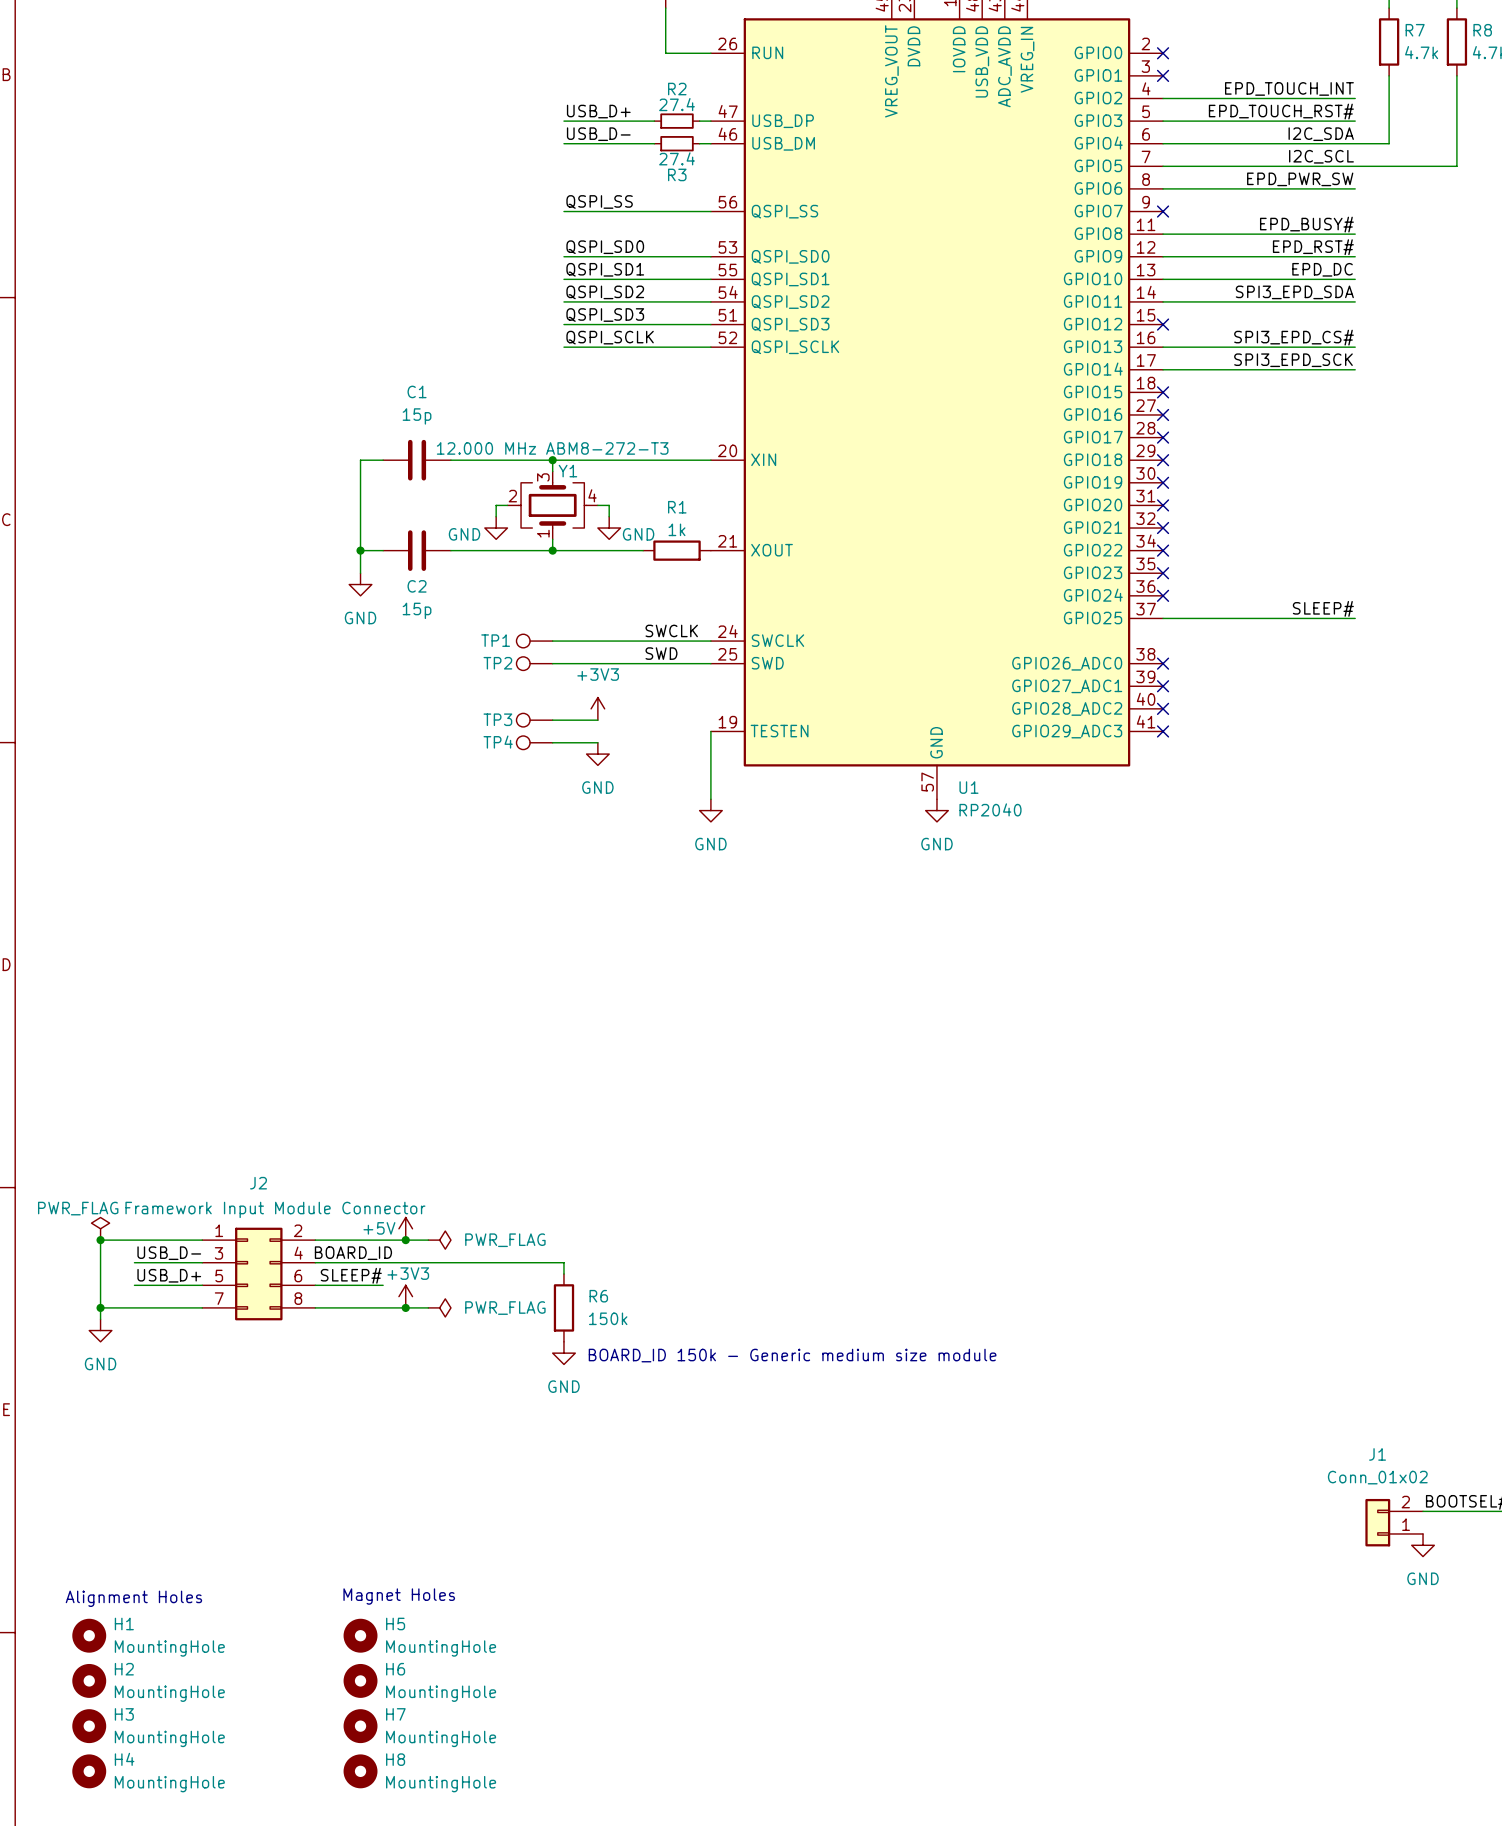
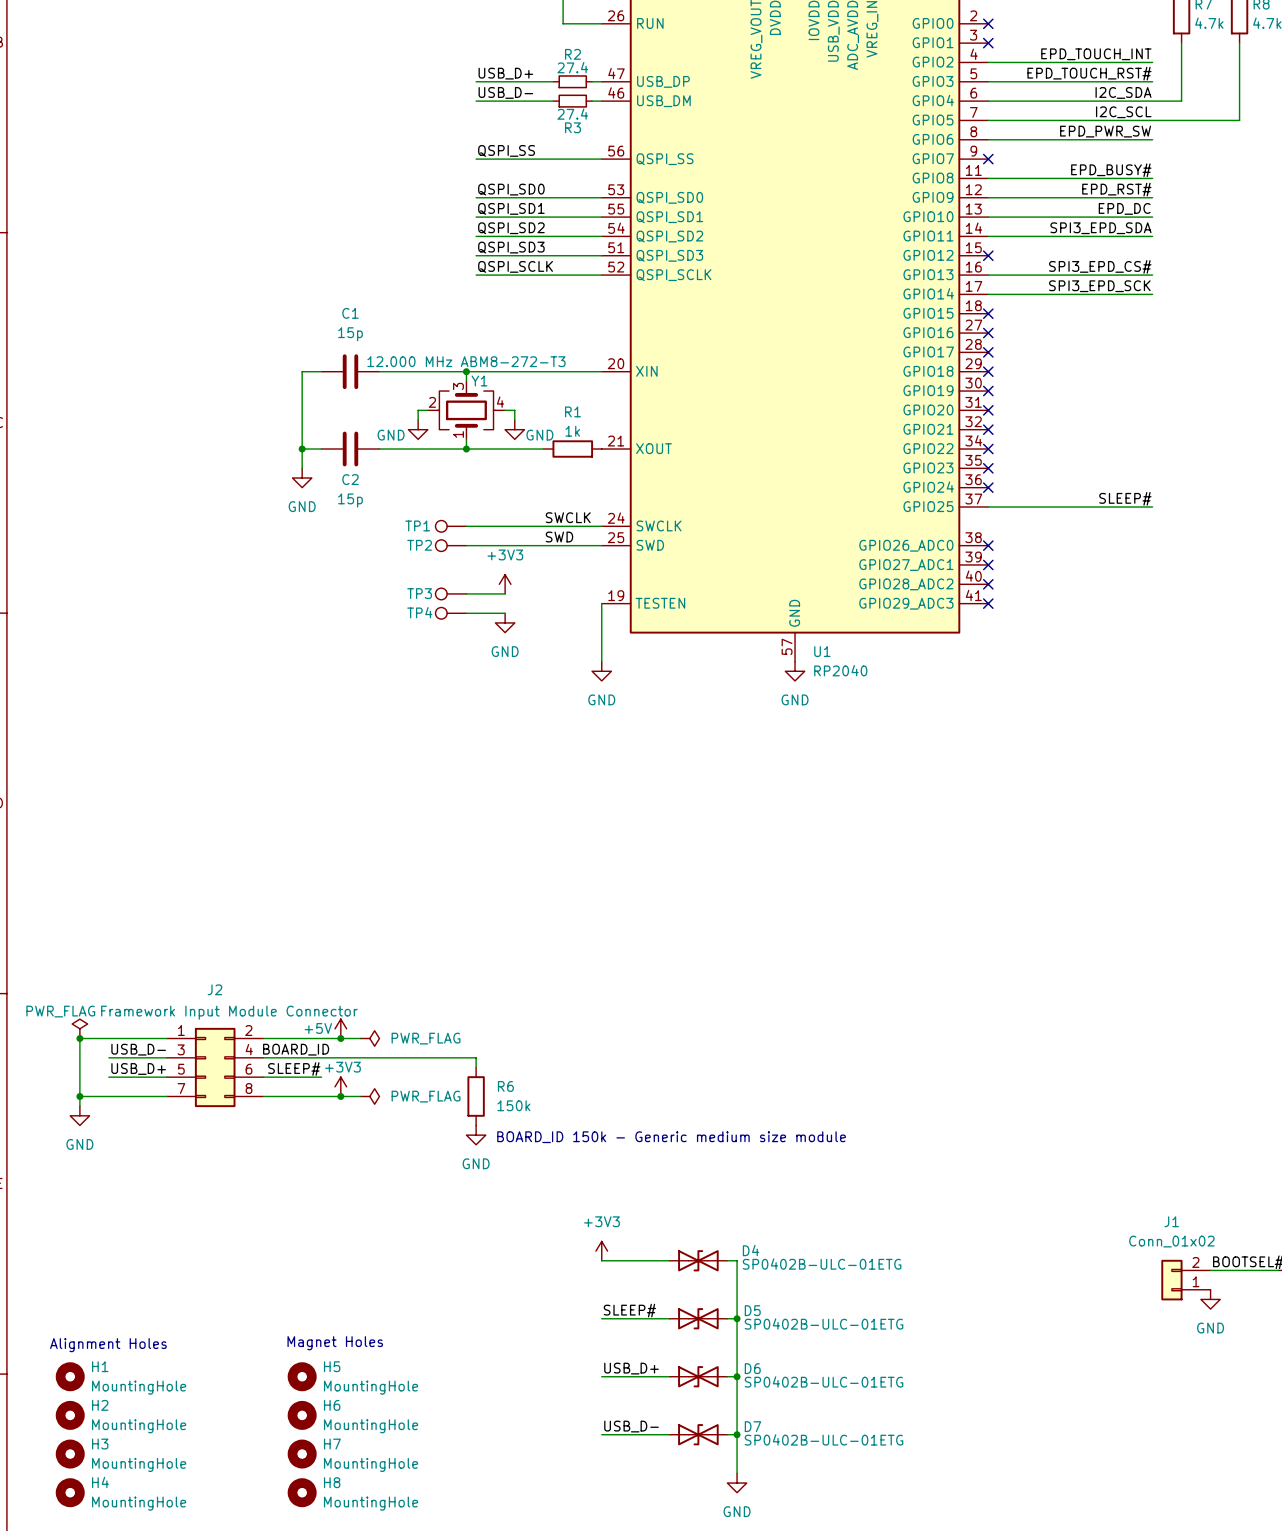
power symbol: none -> +3V3 (601, 1251)
wire: none -> (601, 1260) (669, 1260)
D4: none -> SP0402B-ULC-01ETG (698, 1260)
wire: none -> (727, 1260) (737, 1260) (737, 1473)
label: none -> SLEEP# (629, 1310)
wire: none -> (601, 1318) (669, 1318)
D5: none -> SP0402B-ULC-01ETG (698, 1318)
wire: none -> (727, 1318) (737, 1318)
junction: none -> (737, 1318)
label: none -> USB_D+ (631, 1368)
wire: none -> (601, 1376) (669, 1376)
D6: none -> SP0402B-ULC-01ETG (698, 1376)
wire: none -> (727, 1376) (737, 1376)
junction: none -> (737, 1376)
label: none -> USB_D- (631, 1426)
wire: none -> (601, 1434) (669, 1434)
D7: none -> SP0402B-ULC-01ETG (698, 1434)
wire: none -> (727, 1434) (737, 1434)
junction: none -> (737, 1434)
power symbol: none -> GND (737, 1483)

